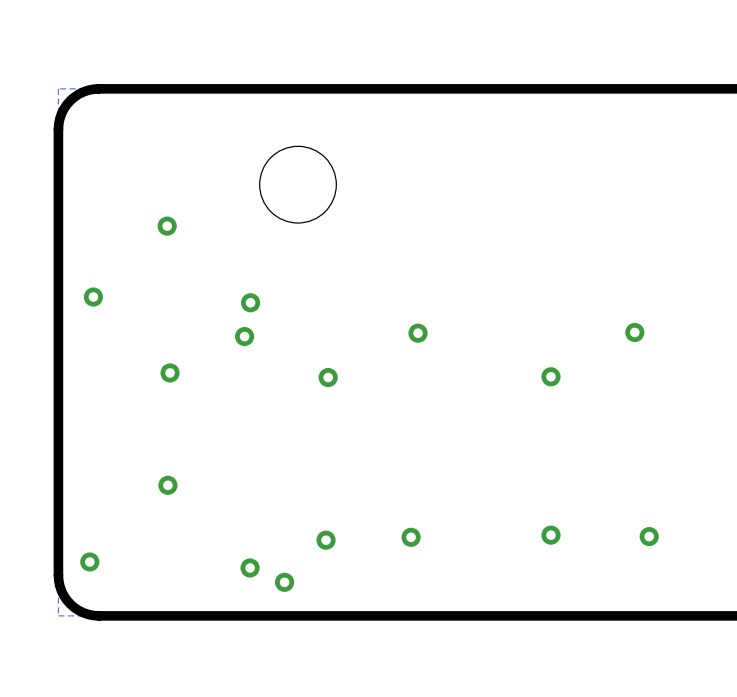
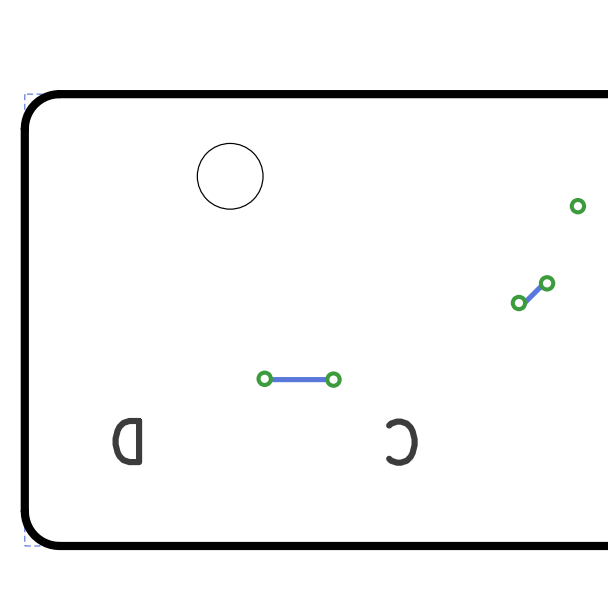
via: none -> (577, 206)
via: (167, 226) -> none
via: (93, 297) -> none
via: (250, 302) -> none
track: none -> (547, 283) (544, 283) (523, 304)
via: none -> (547, 283)
via: (418, 333) -> none
via: (244, 336) -> none
via: (170, 372) -> none
via: (550, 376) -> none
via position: (328, 377) -> (264, 378)
track: none -> (264, 378) (333, 379)
via: none -> (333, 379)
via: (167, 485) -> none
text: none -> D (127, 441)
text: none -> C (401, 442)
via: (550, 535) -> none
via: (649, 536) -> none
via: (411, 537) -> none
via: (326, 540) -> none
via: (89, 561) -> none
via: (250, 567) -> none
via: (284, 582) -> none

